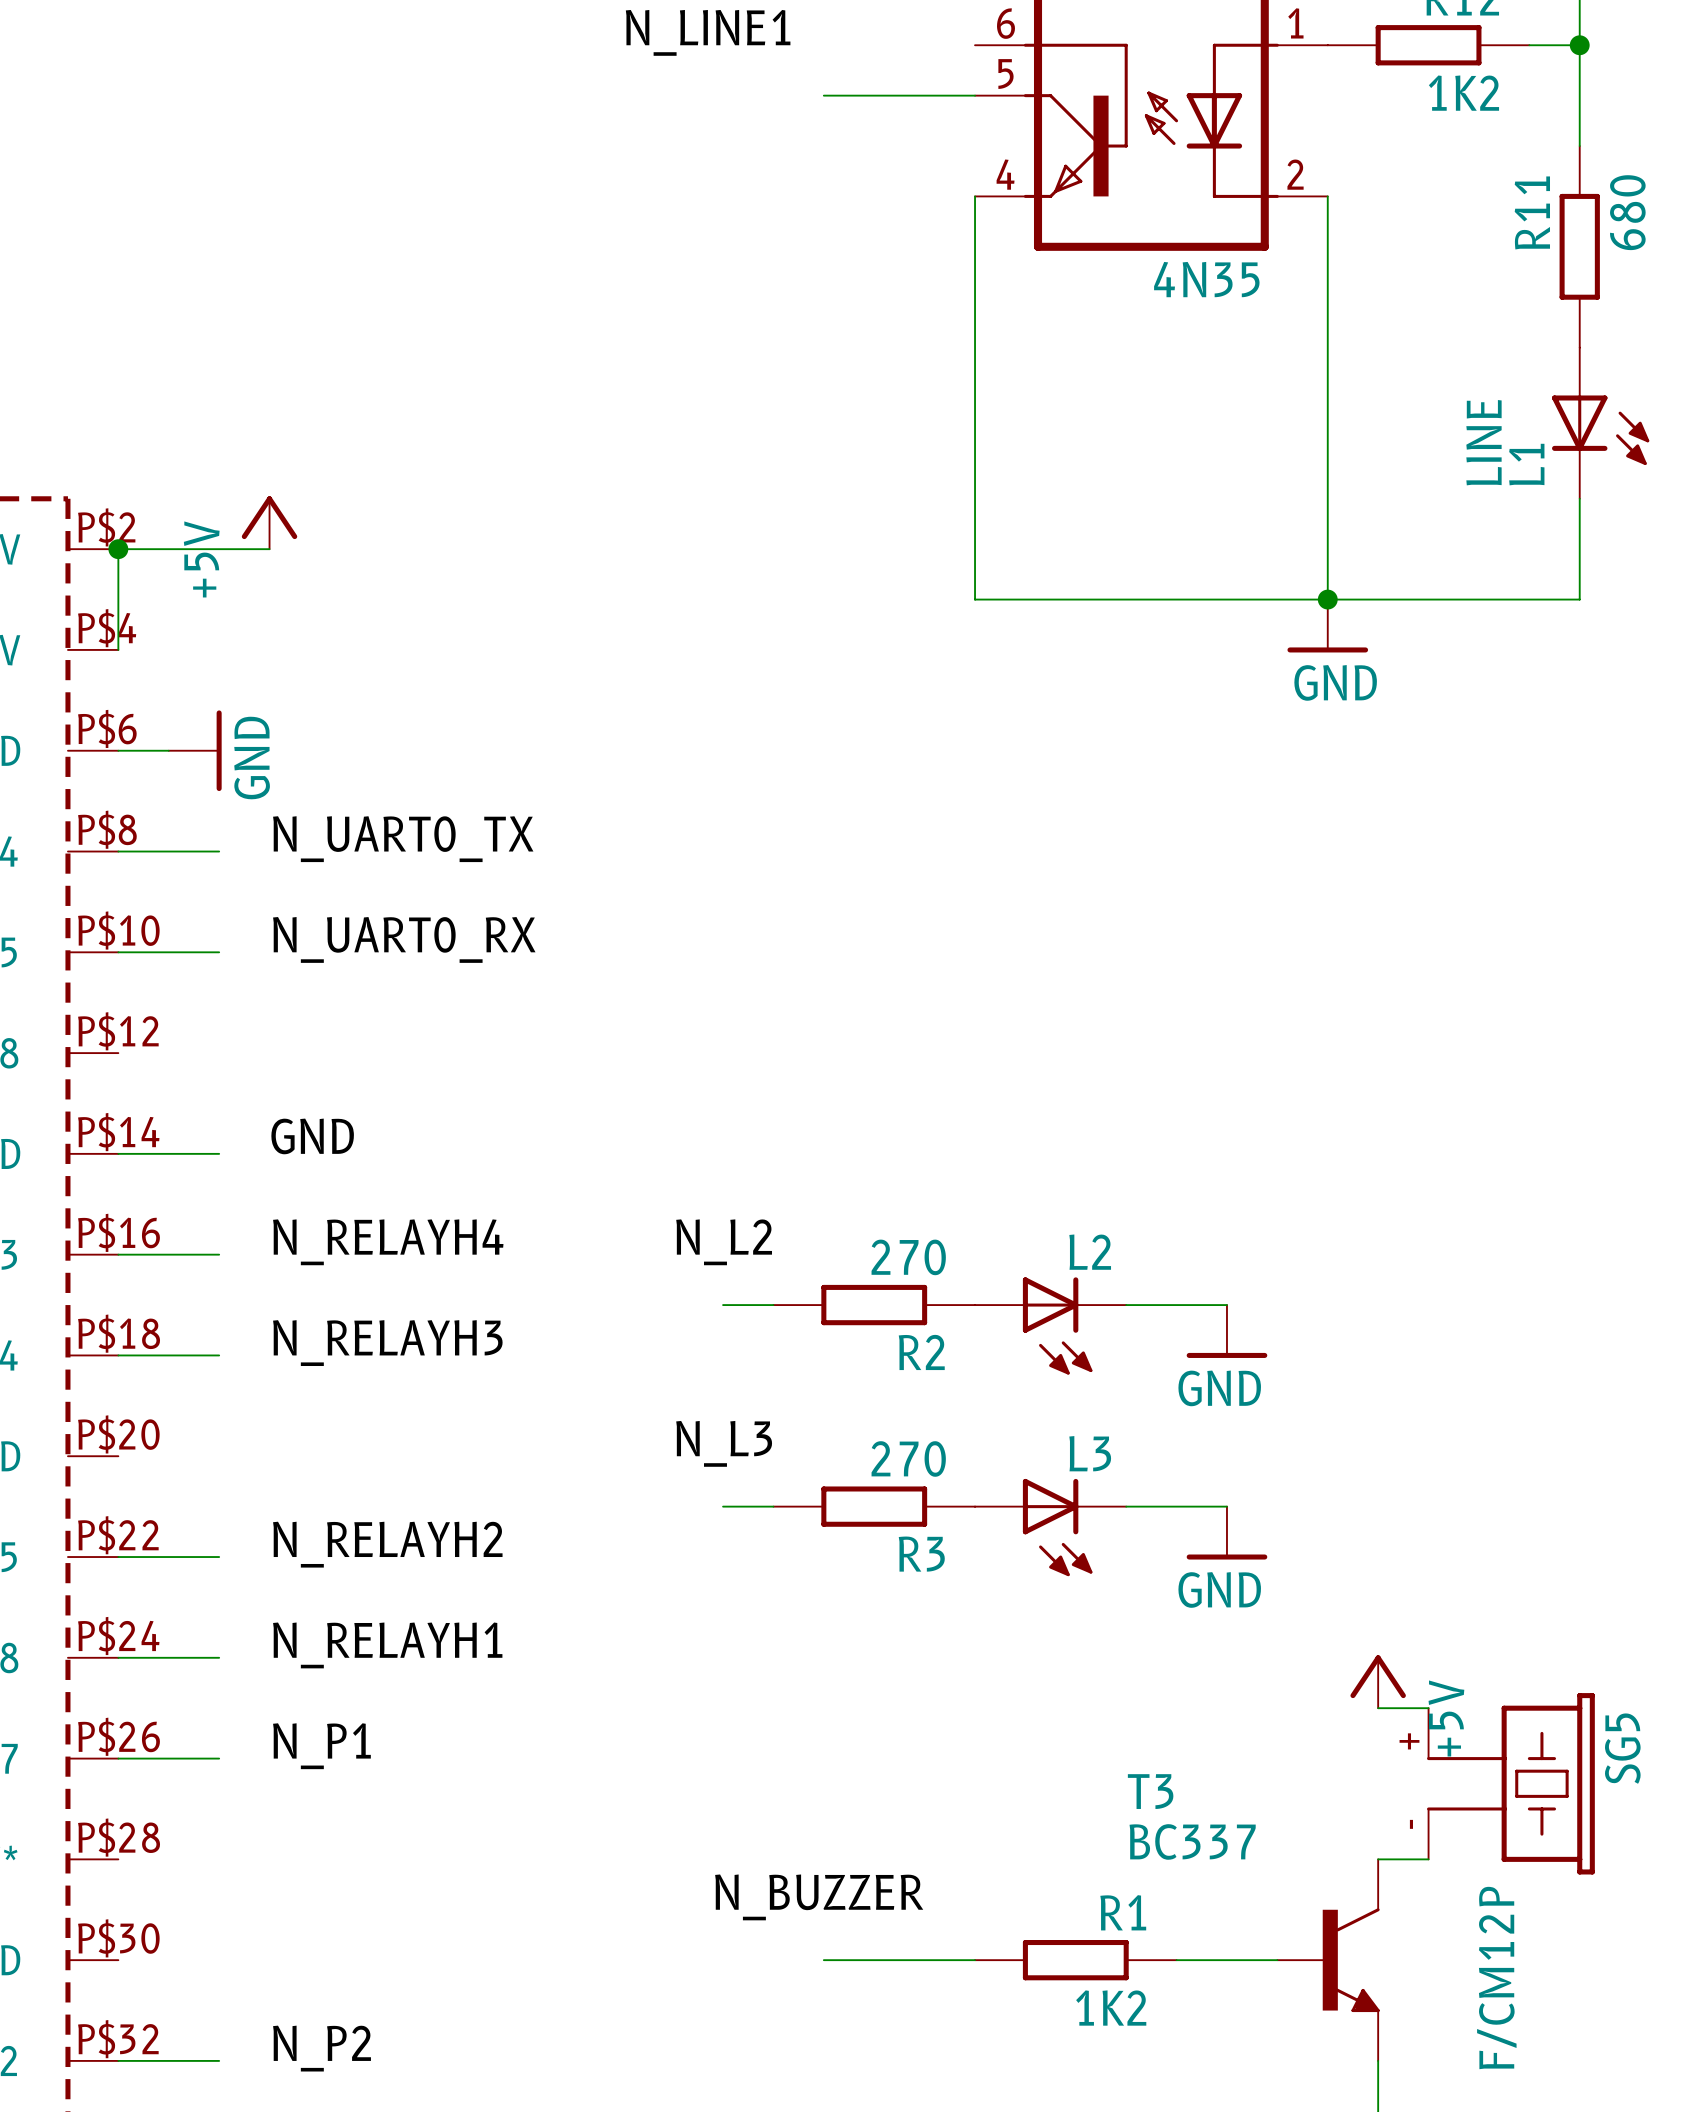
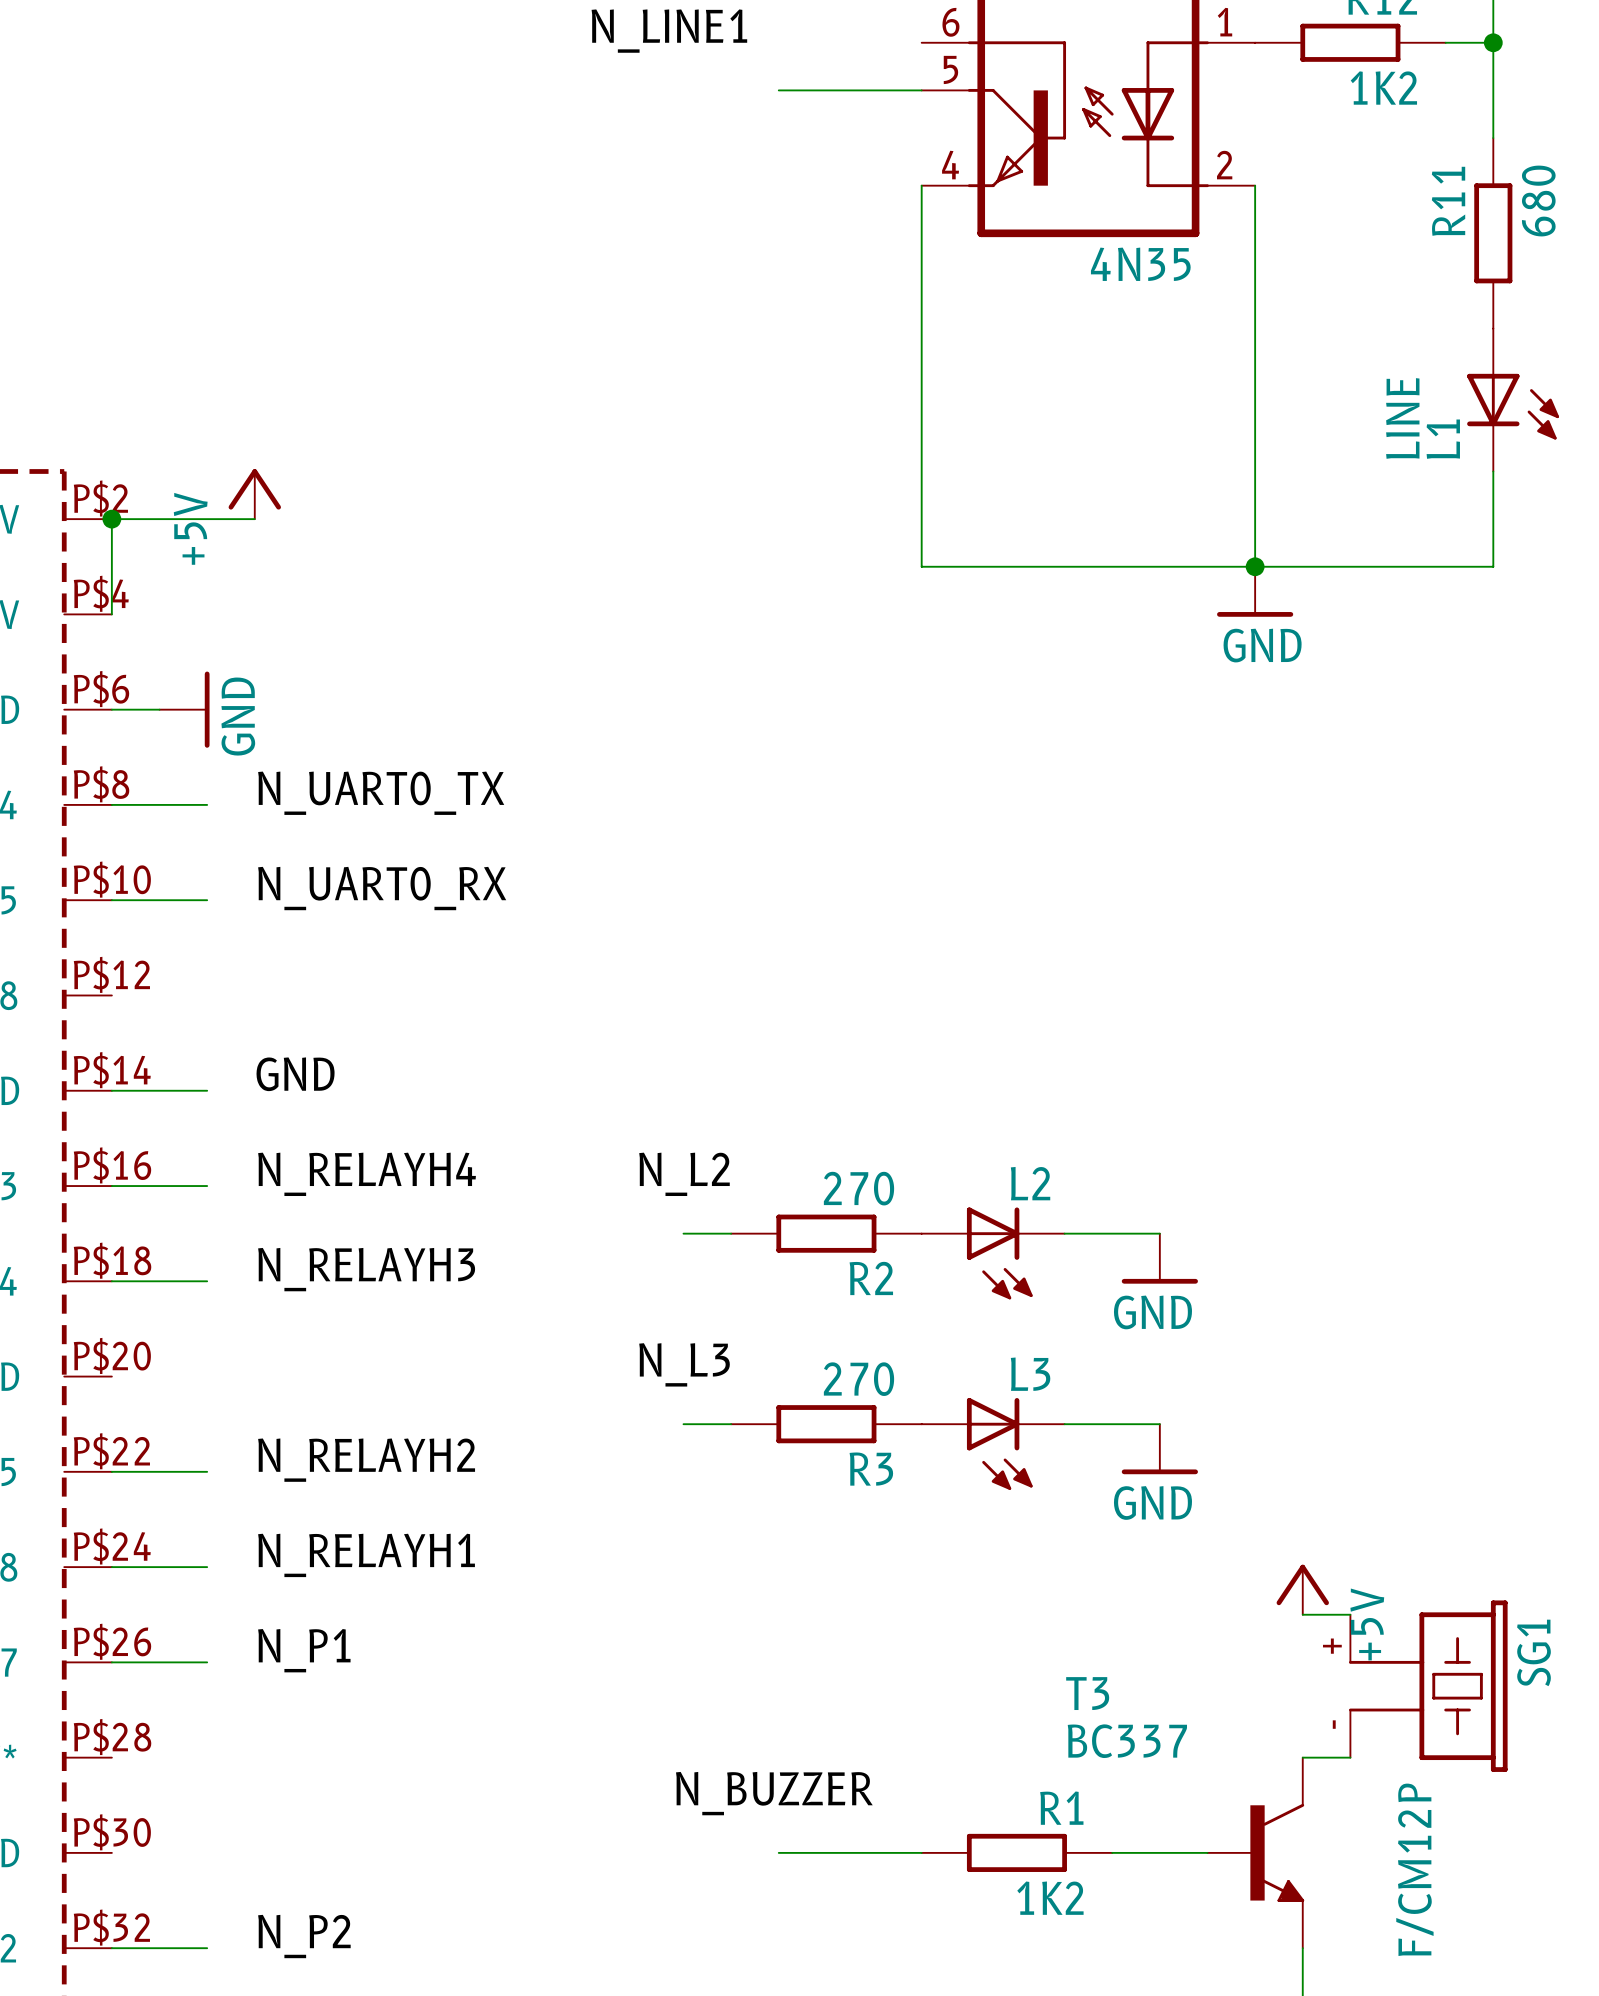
SG5 name: SG5 (1622, 1748) -> SG1 (1533, 1652)

